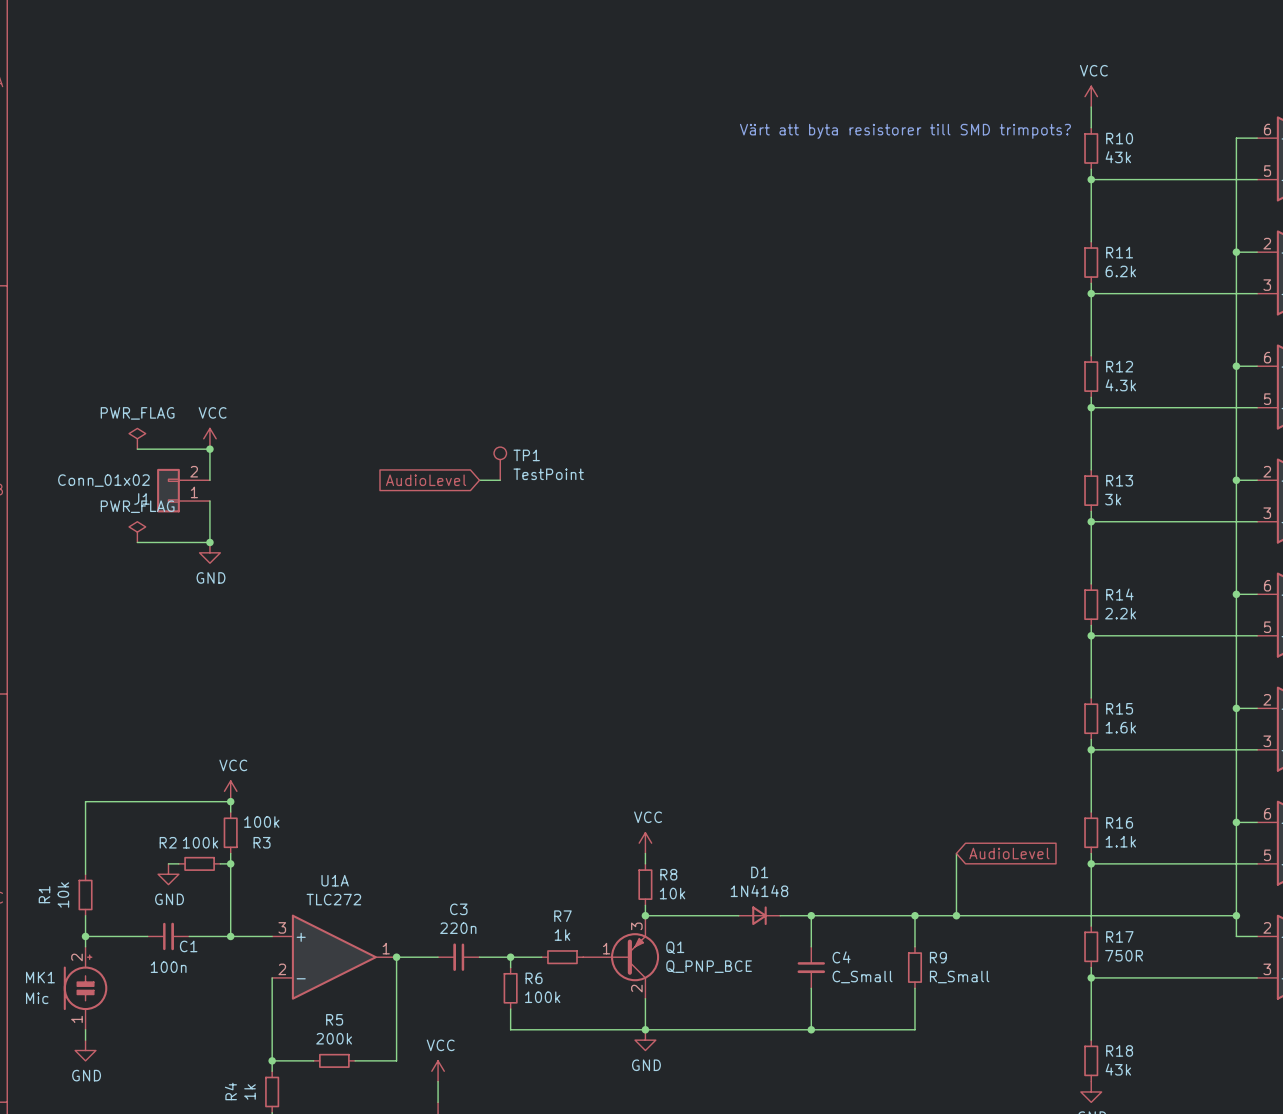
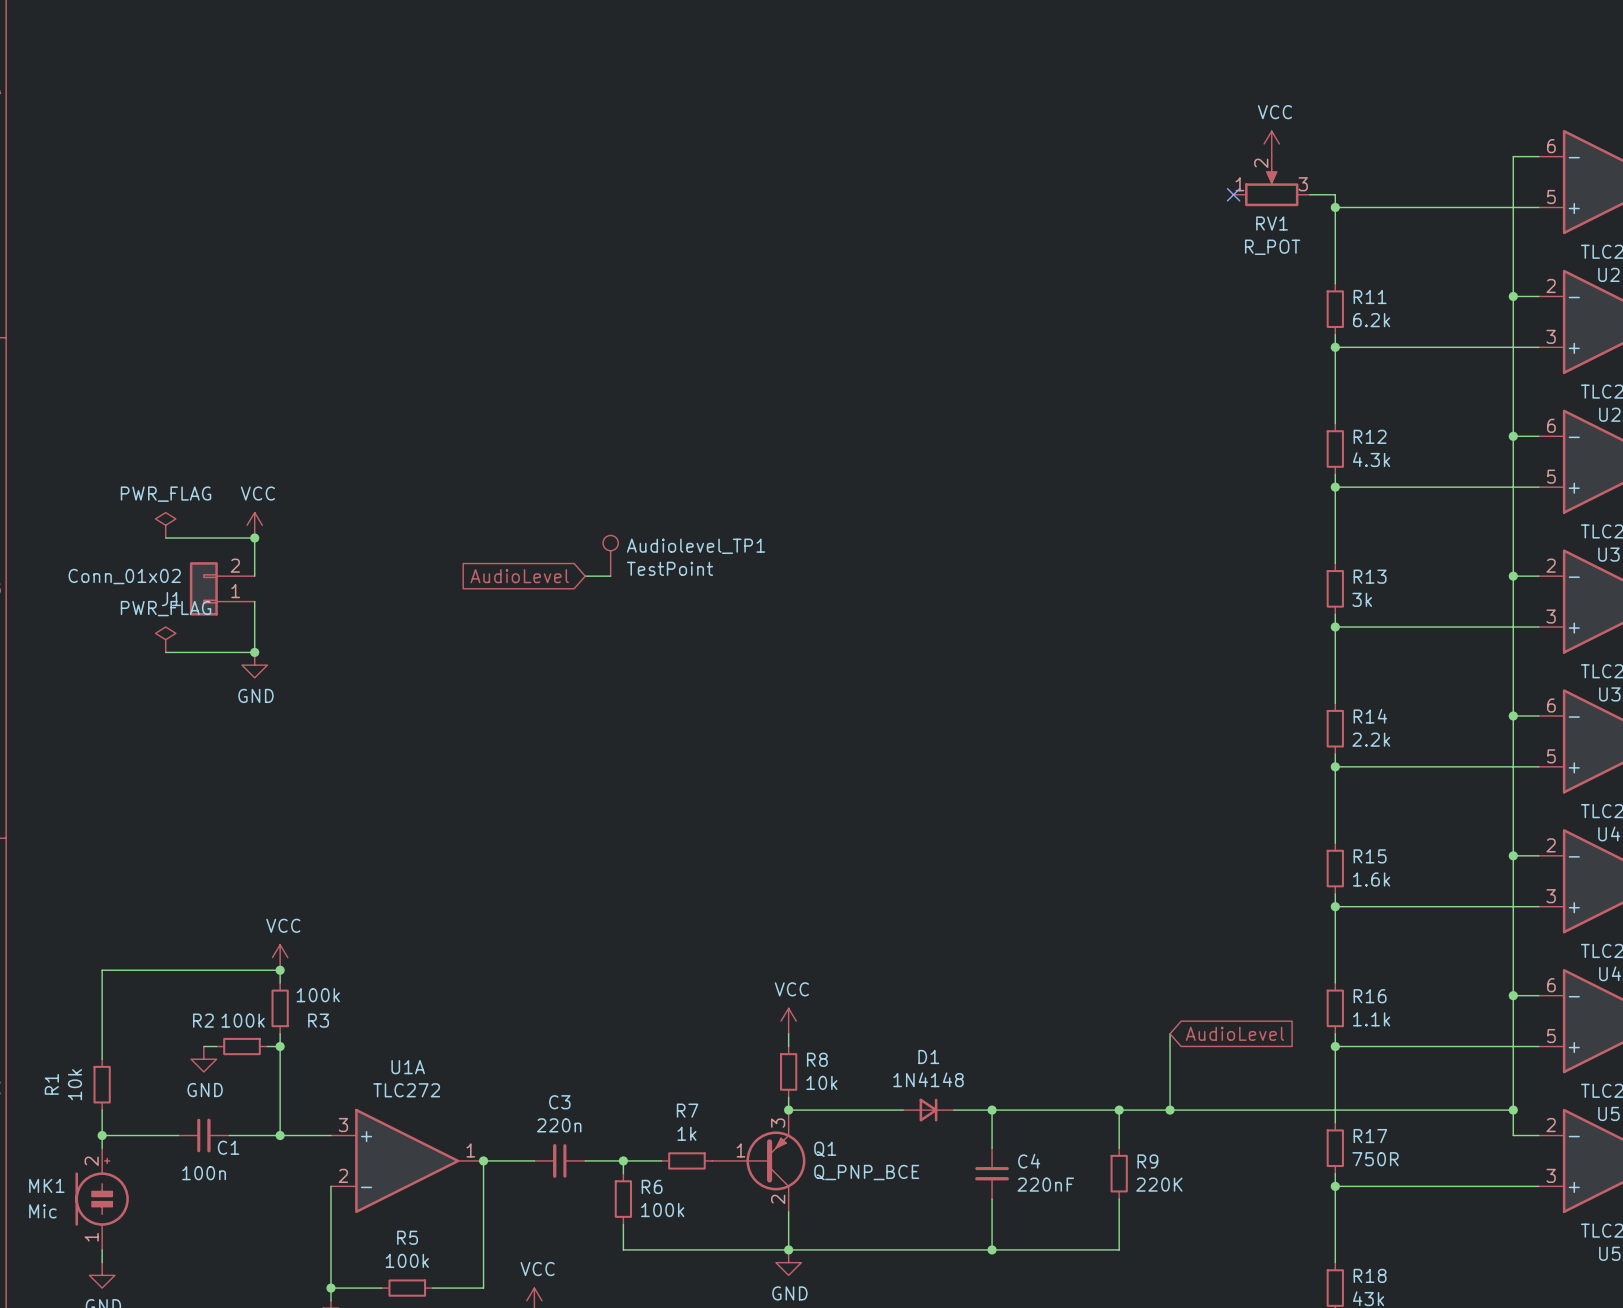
power symbol position: VCC (1091, 96) -> VCC (1271, 143)
wire: (1091, 107) (1091, 127) -> none
text: Värt att byta resistorer till SMD trimpots? (905, 131) -> none
R10: 43k (1091, 148) -> none
RV1: none -> R_POT (1271, 181)
no-connect mark: none -> (1233, 194)
wire: none -> (1309, 194) (1335, 194)
TP1 name: TP1 (526, 455) -> Audiolevel_TP1 (696, 546)
C4 value: C_Small (862, 977) -> 220nF (1045, 1184)
R9 value: R_Small (959, 977) -> 220K (1159, 1184)
R5 value: 200k (334, 1038) -> 100k (407, 1260)

